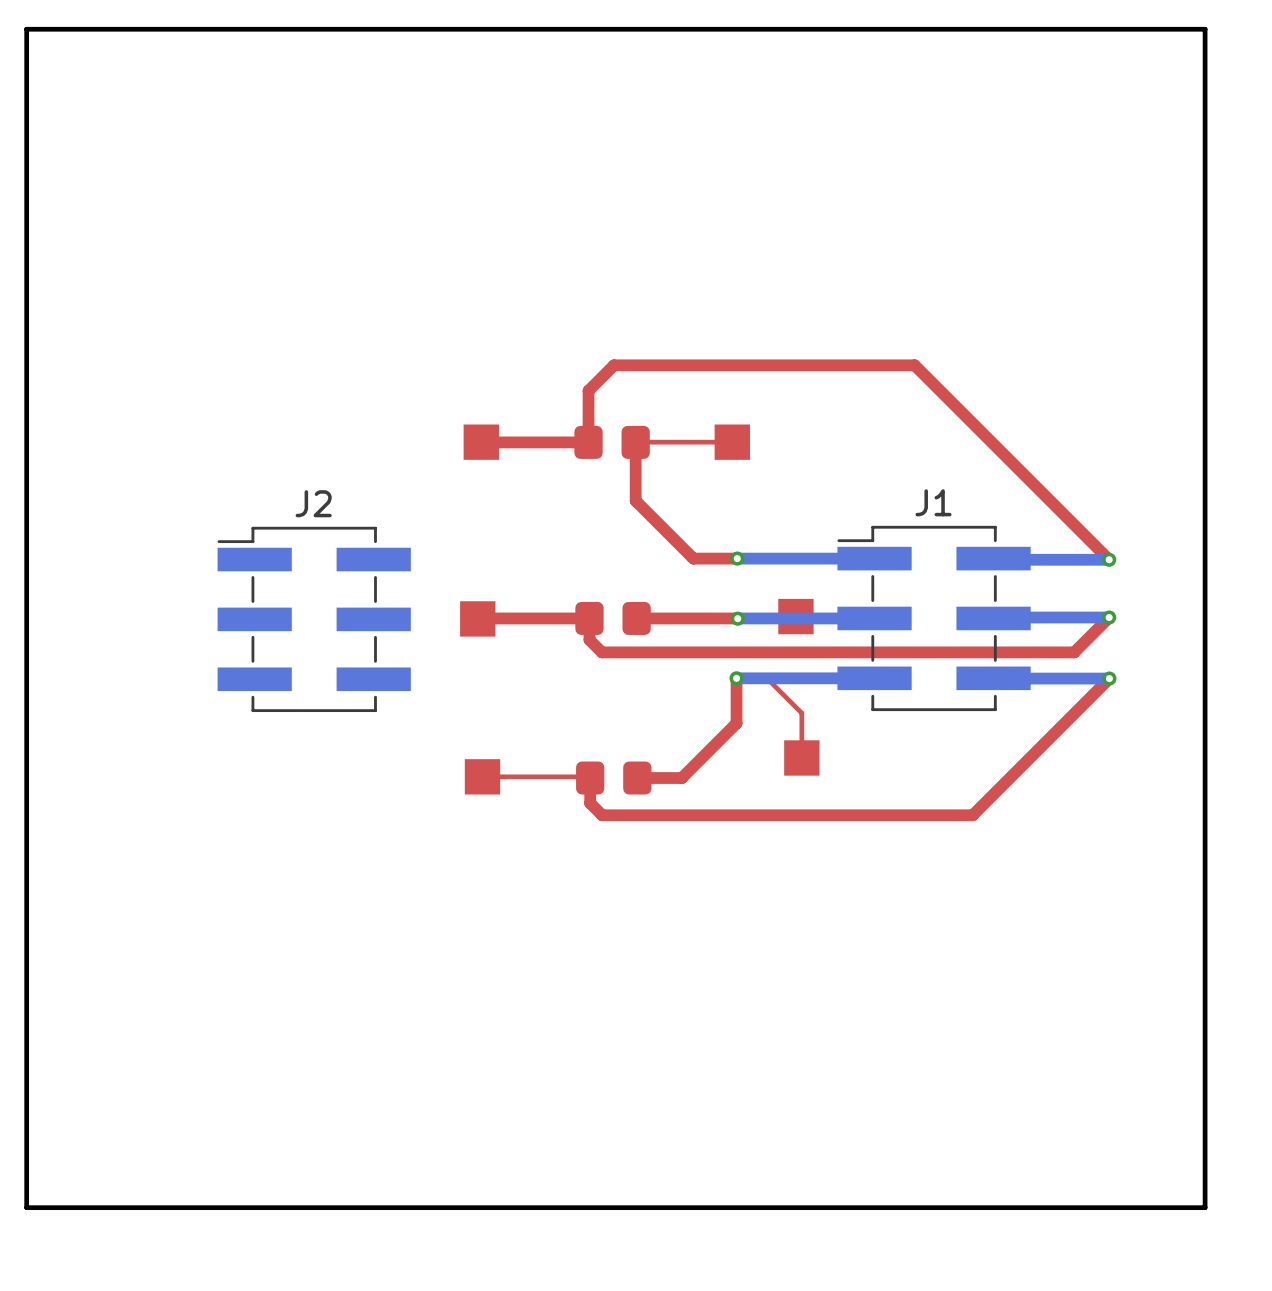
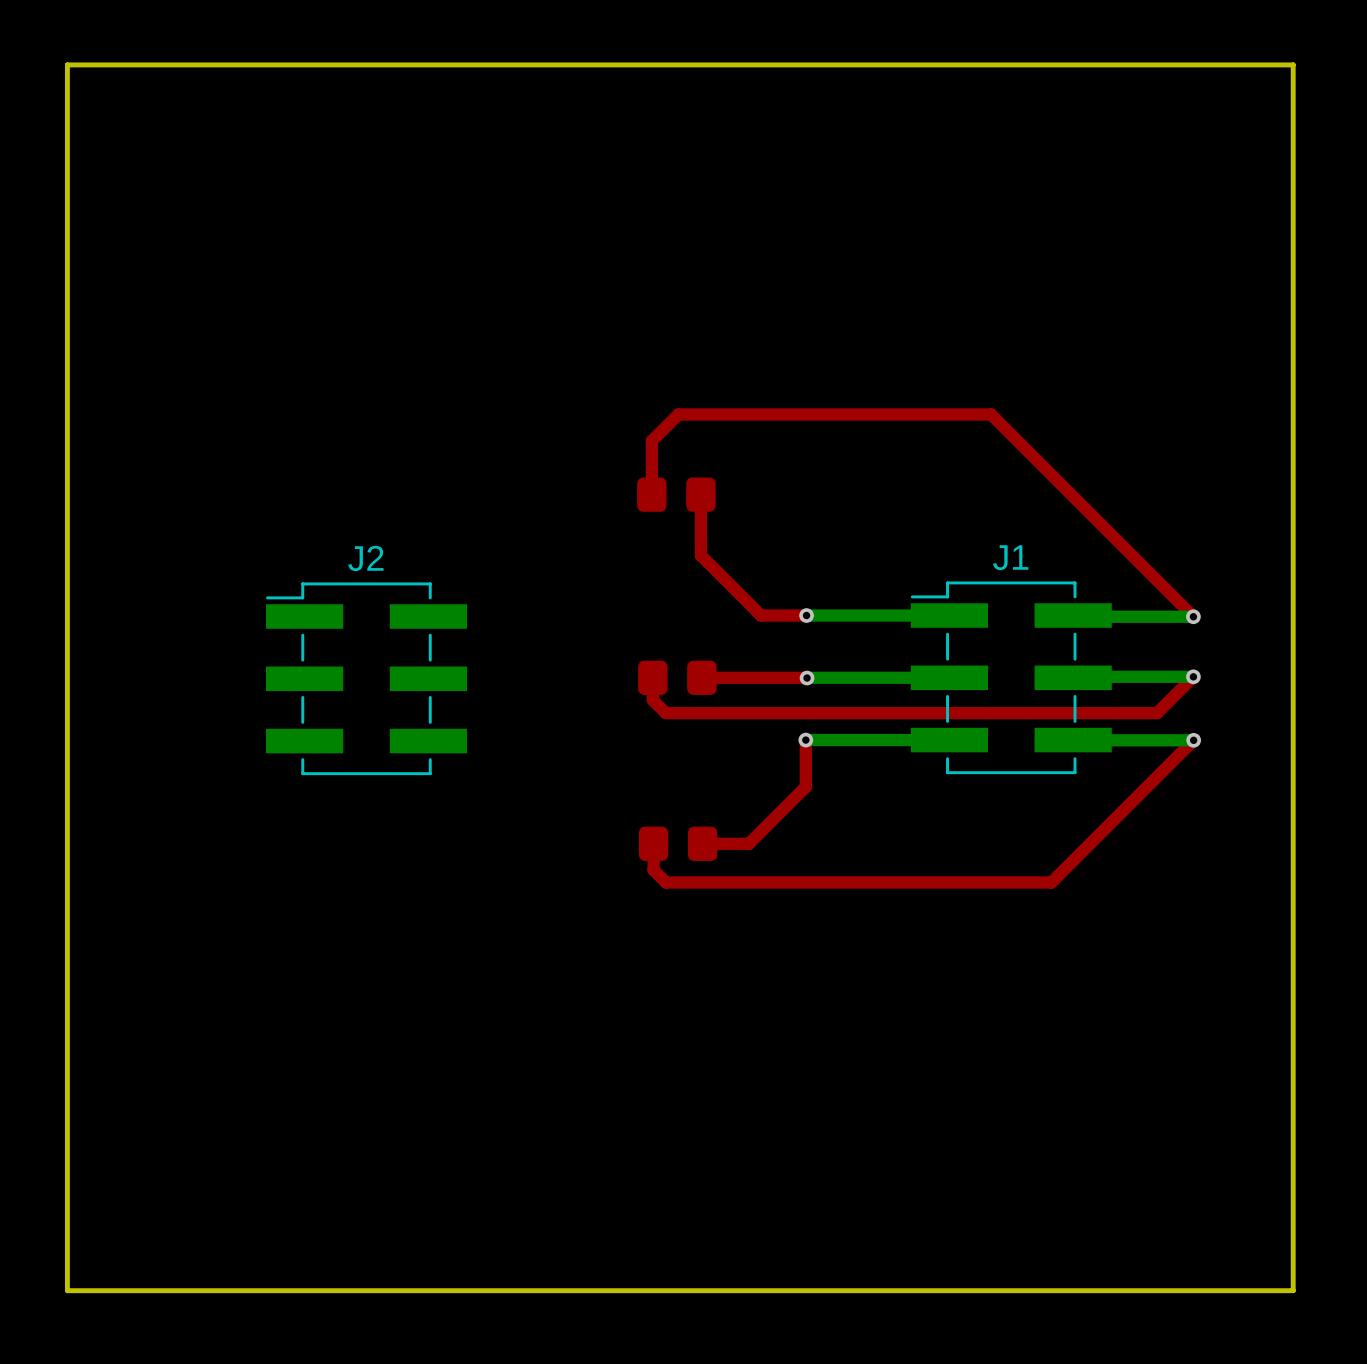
part: (481, 442) -> none
top track: (588, 442) (481, 442) -> none
top track: (732, 442) (635, 442) -> none
part: (732, 442) -> none
part: (795, 616) -> none
part: (477, 618) -> none
top track: (589, 618) (477, 618) -> none
top track: (736, 678) (766, 678) (801, 713) (801, 757) -> none
part: (801, 757) -> none
top track: (482, 776) (590, 778) -> none
part: (482, 776) -> none

